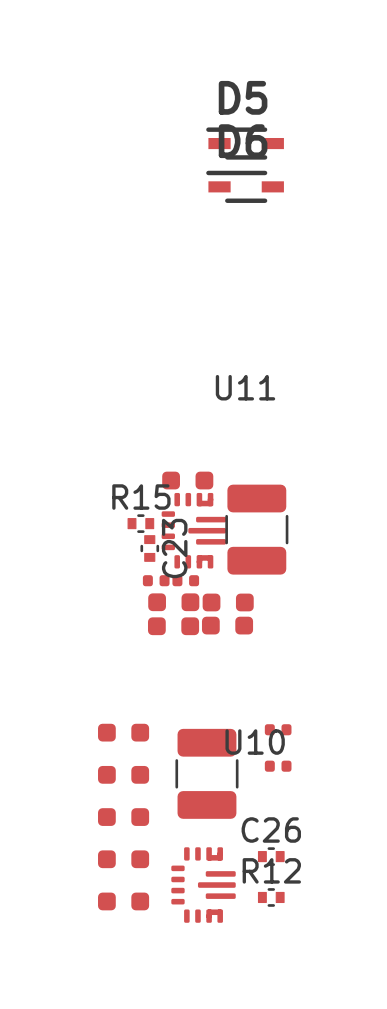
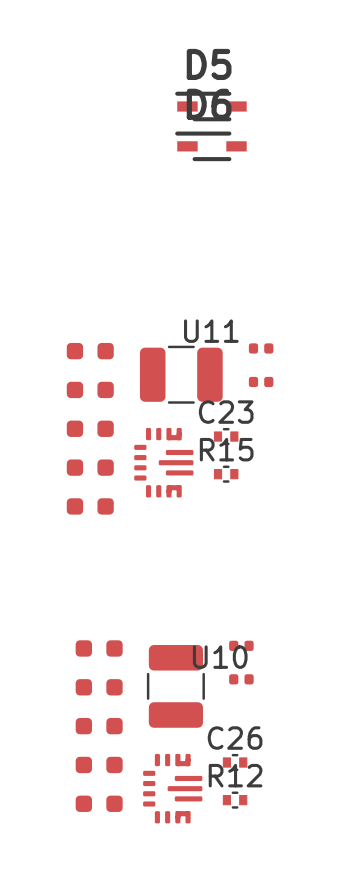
part: none -> (261, 348)
part: none -> (90, 351)
part: none -> (261, 381)
part: none -> (90, 389)
part: (187, 480) -> none
part: none -> (90, 428)
R15 position: (140, 523) -> (226, 474)
part rotation: 0° (256, 529) -> 90° clockwise (181, 374)
part position: (256, 529) -> (181, 374)
part: none -> (90, 467)
C23 rotation: 0° (149, 548) -> 90° clockwise (226, 436)
C23 position: (149, 548) -> (226, 436)
part: none -> (90, 506)
part: (156, 580) -> none
part: (185, 580) -> none
part: (173, 602) -> none
part: (228, 602) -> none
part: (227, 625) -> none
part: (173, 626) -> none

